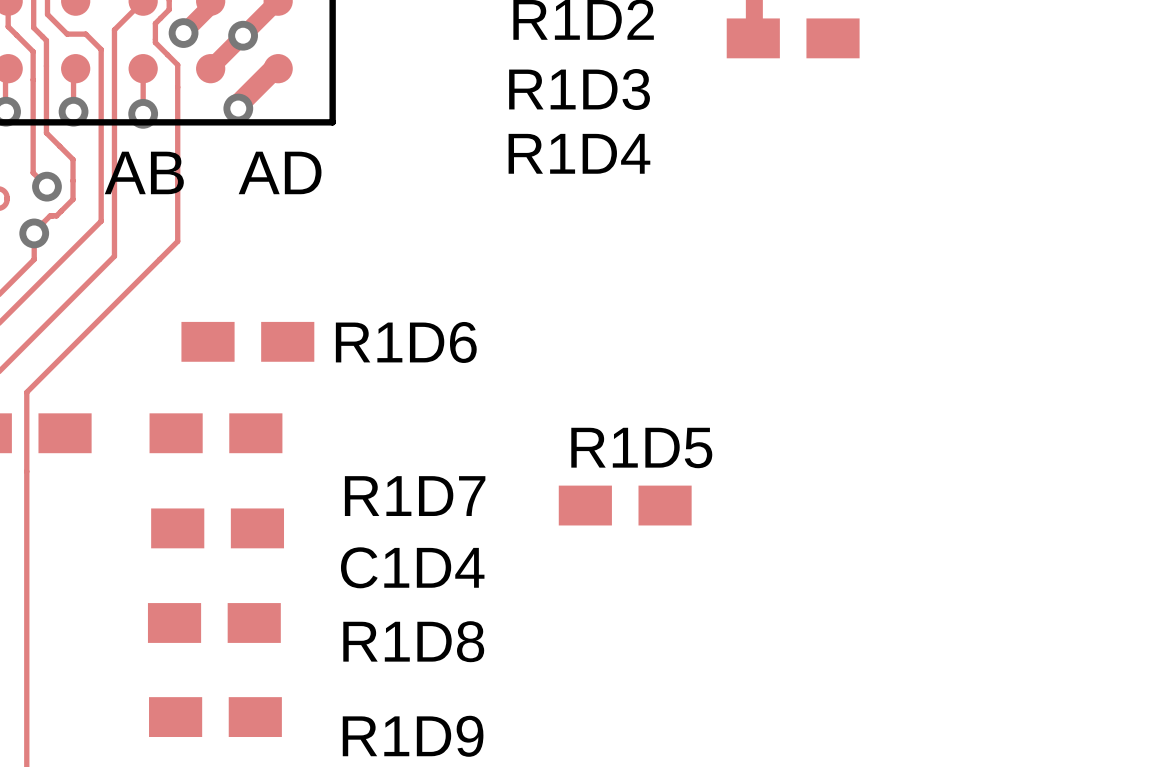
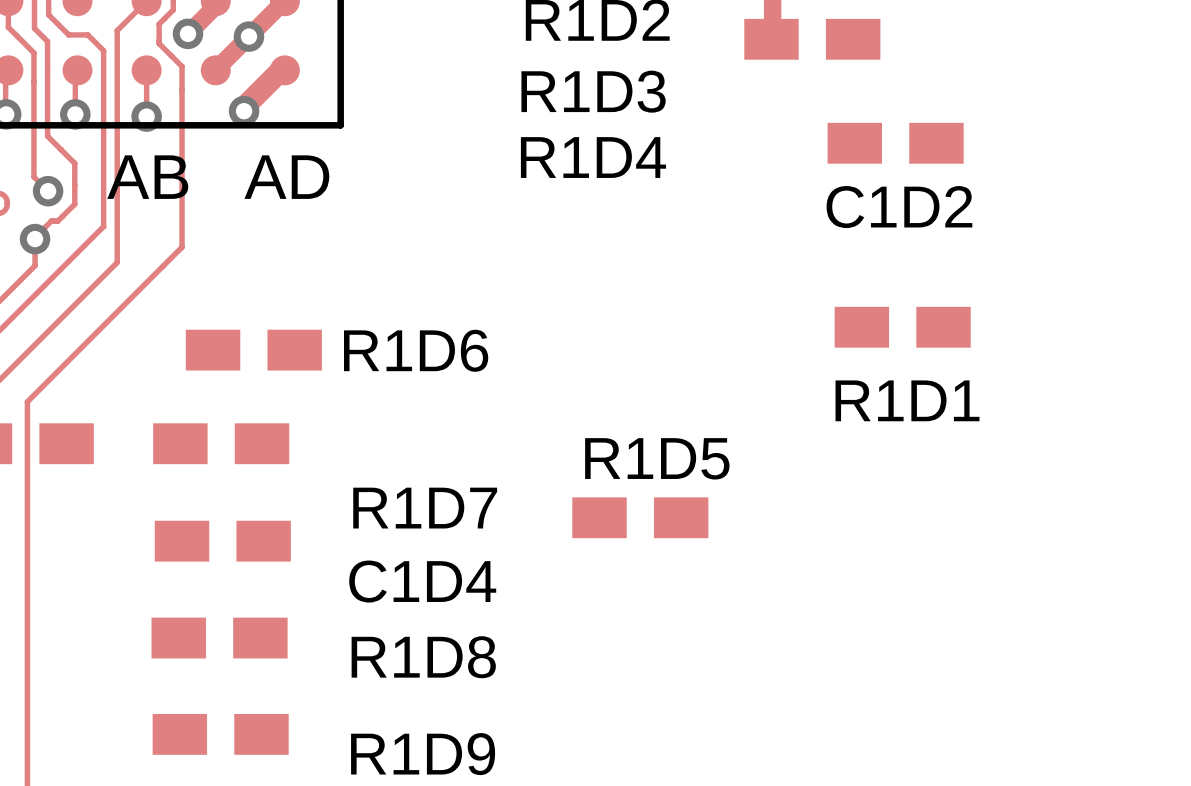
C1D2: none -> (895, 143)
R1D1: none -> (902, 327)

